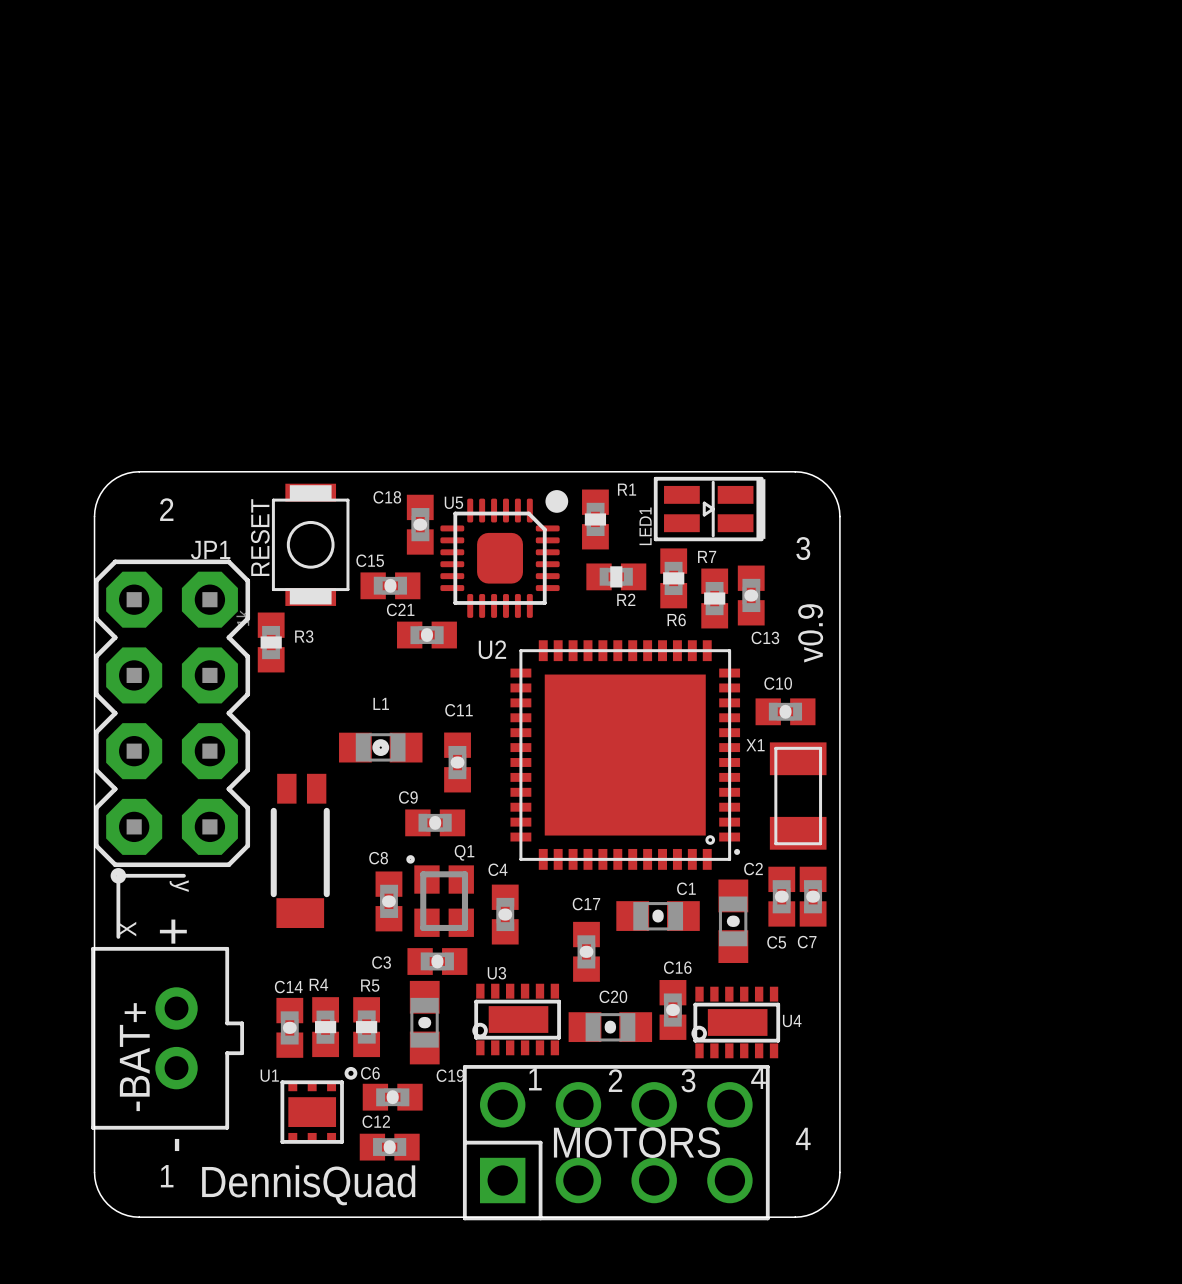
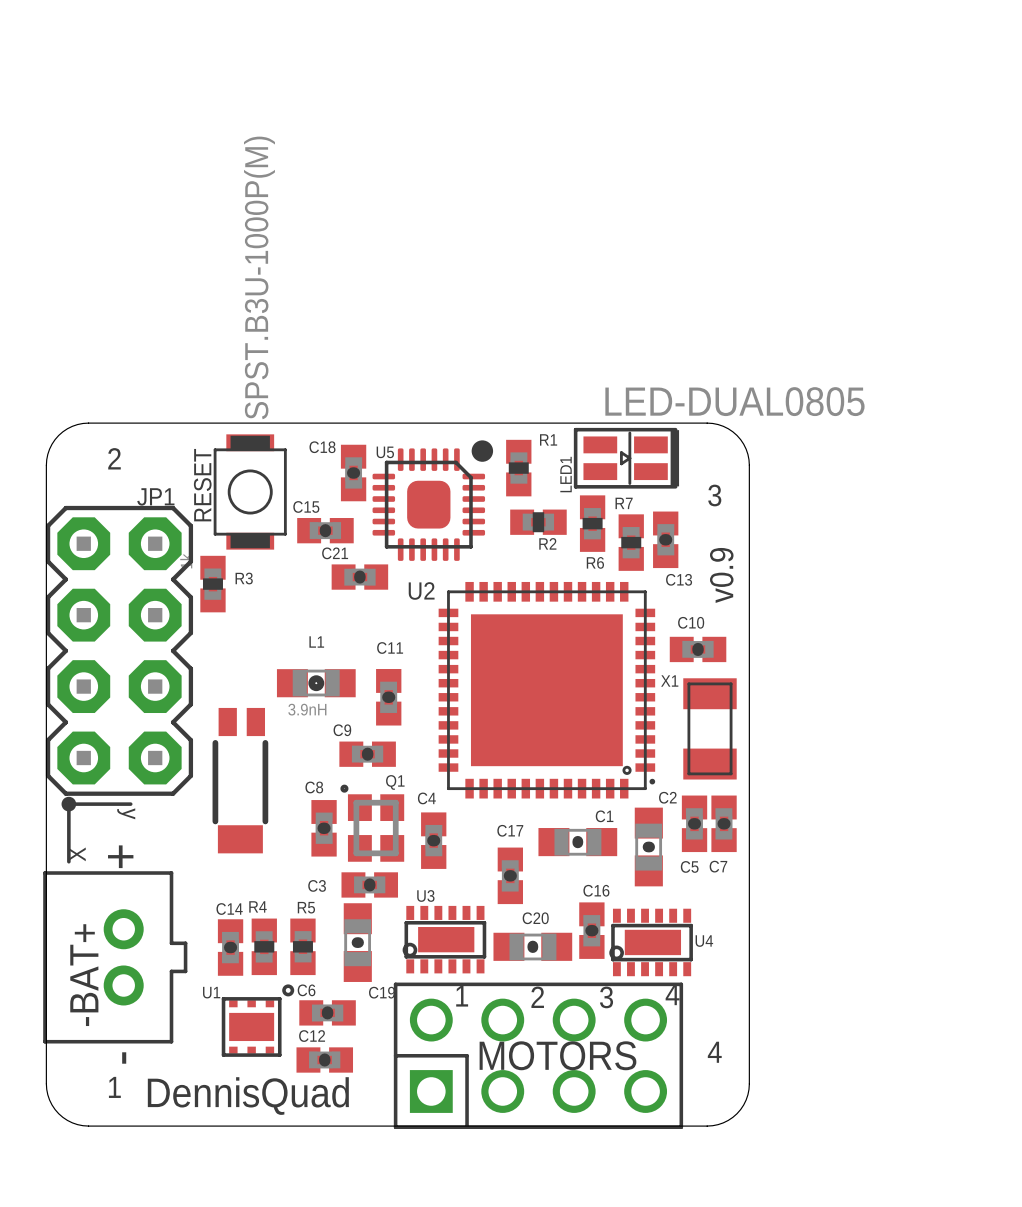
RESET value: none -> SPST.B3U-1000P(M) (259, 277)
LED1 value: none -> LED-DUAL0805 (734, 401)
L1 value: none -> 3.9nH (307, 709)

